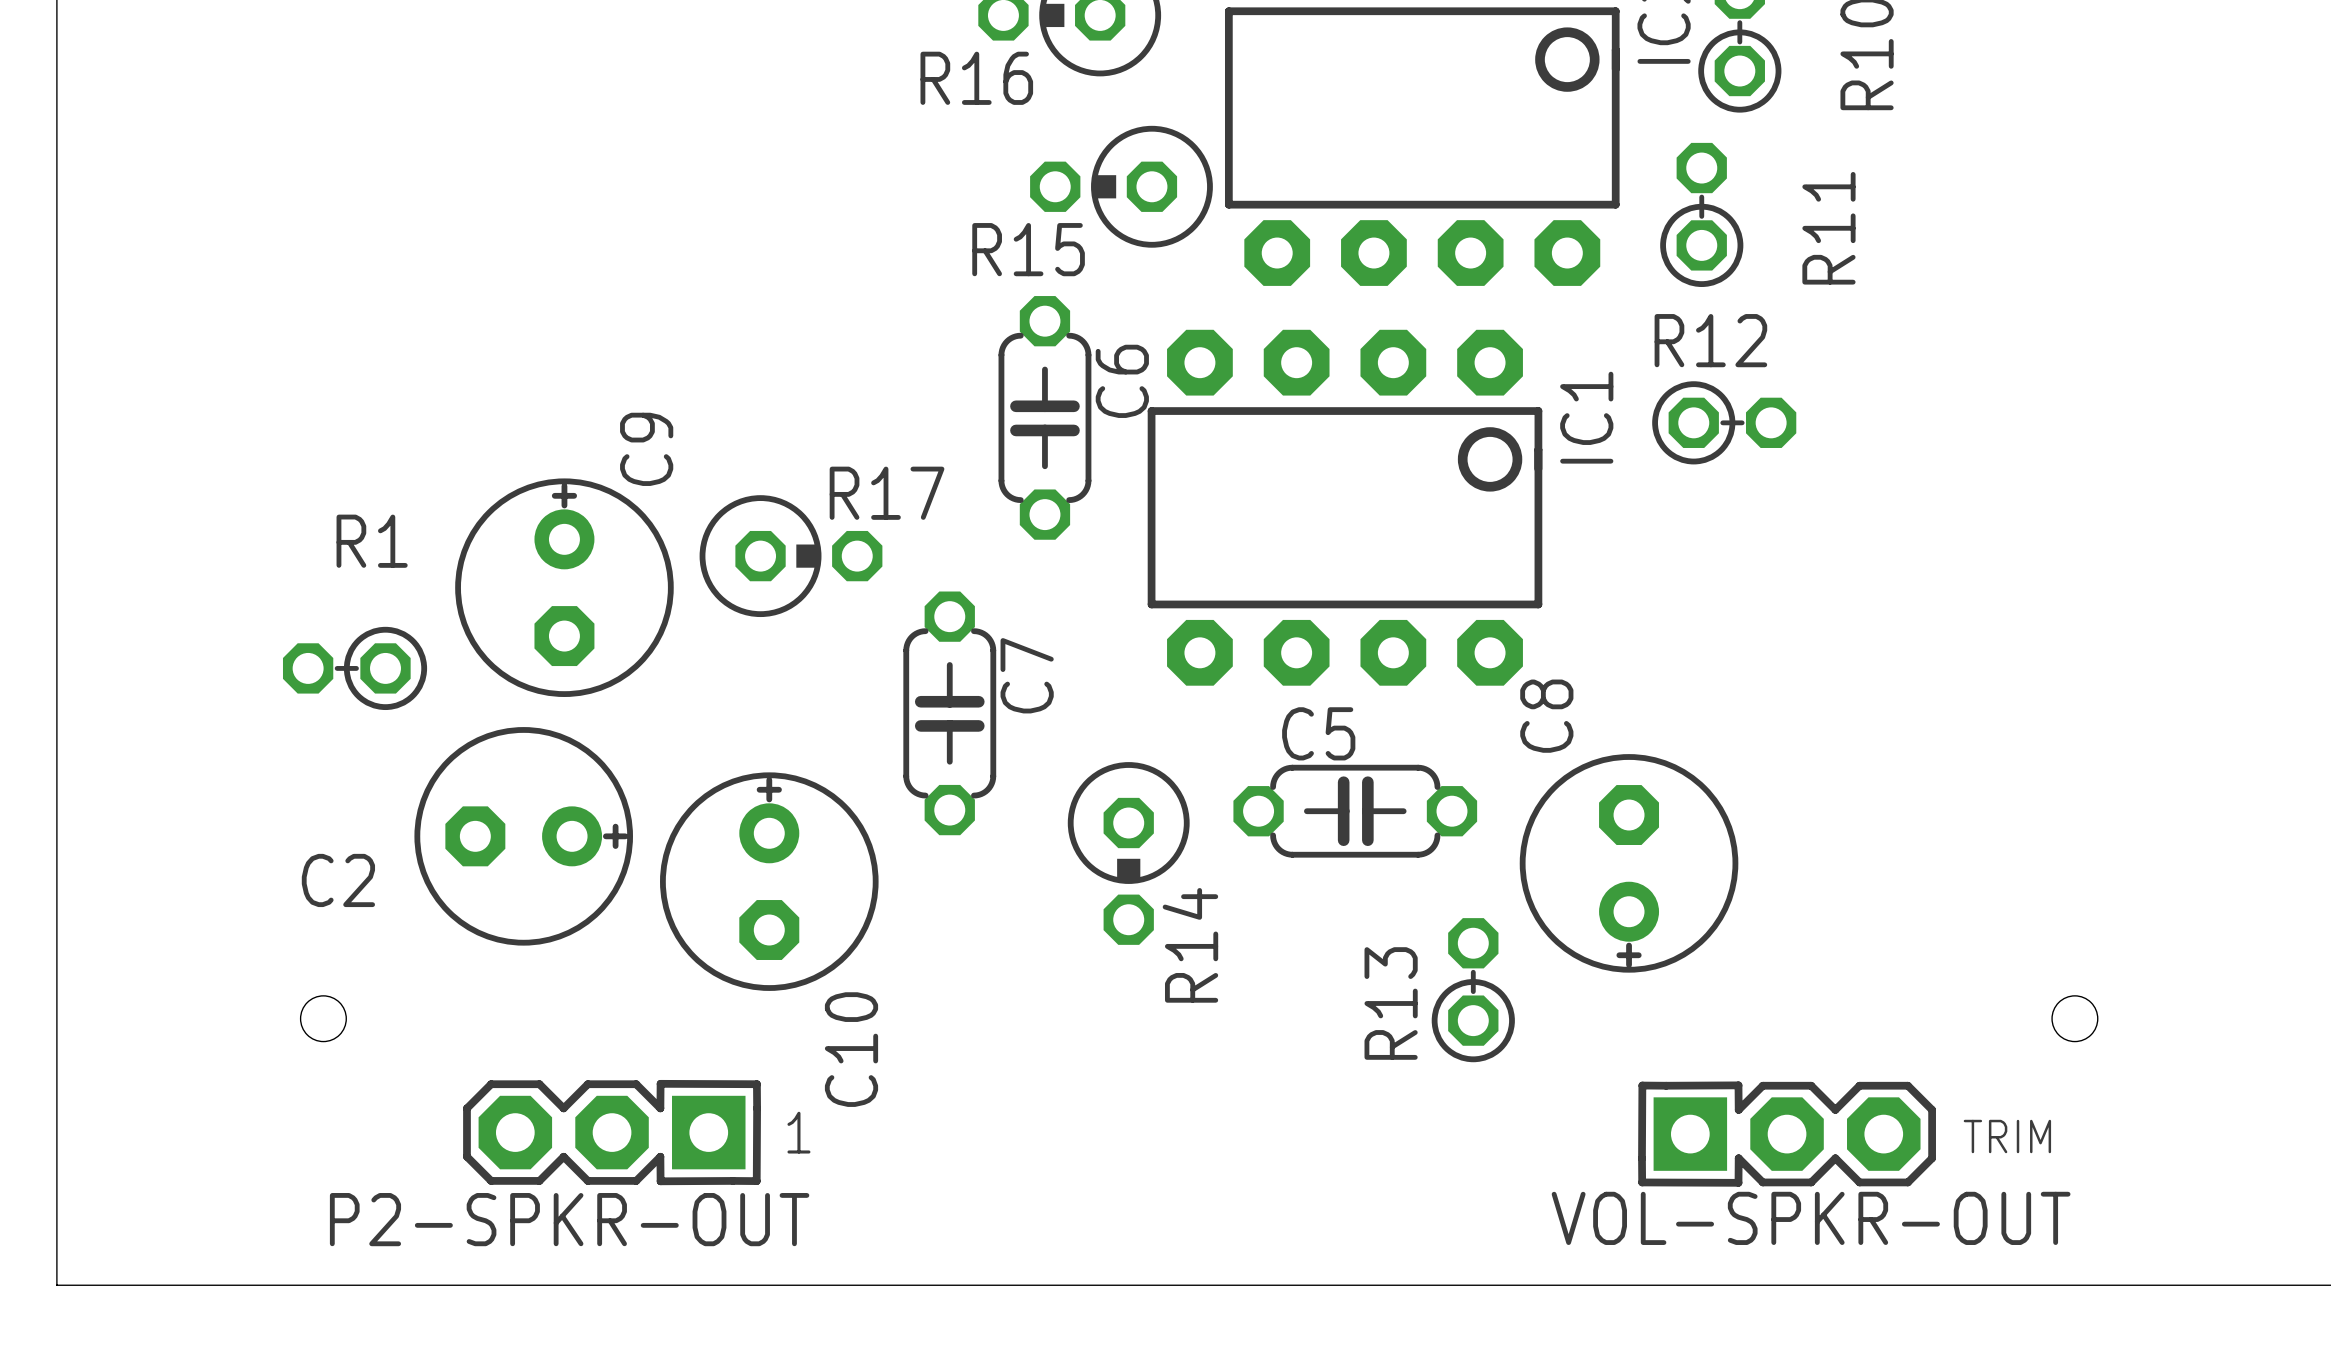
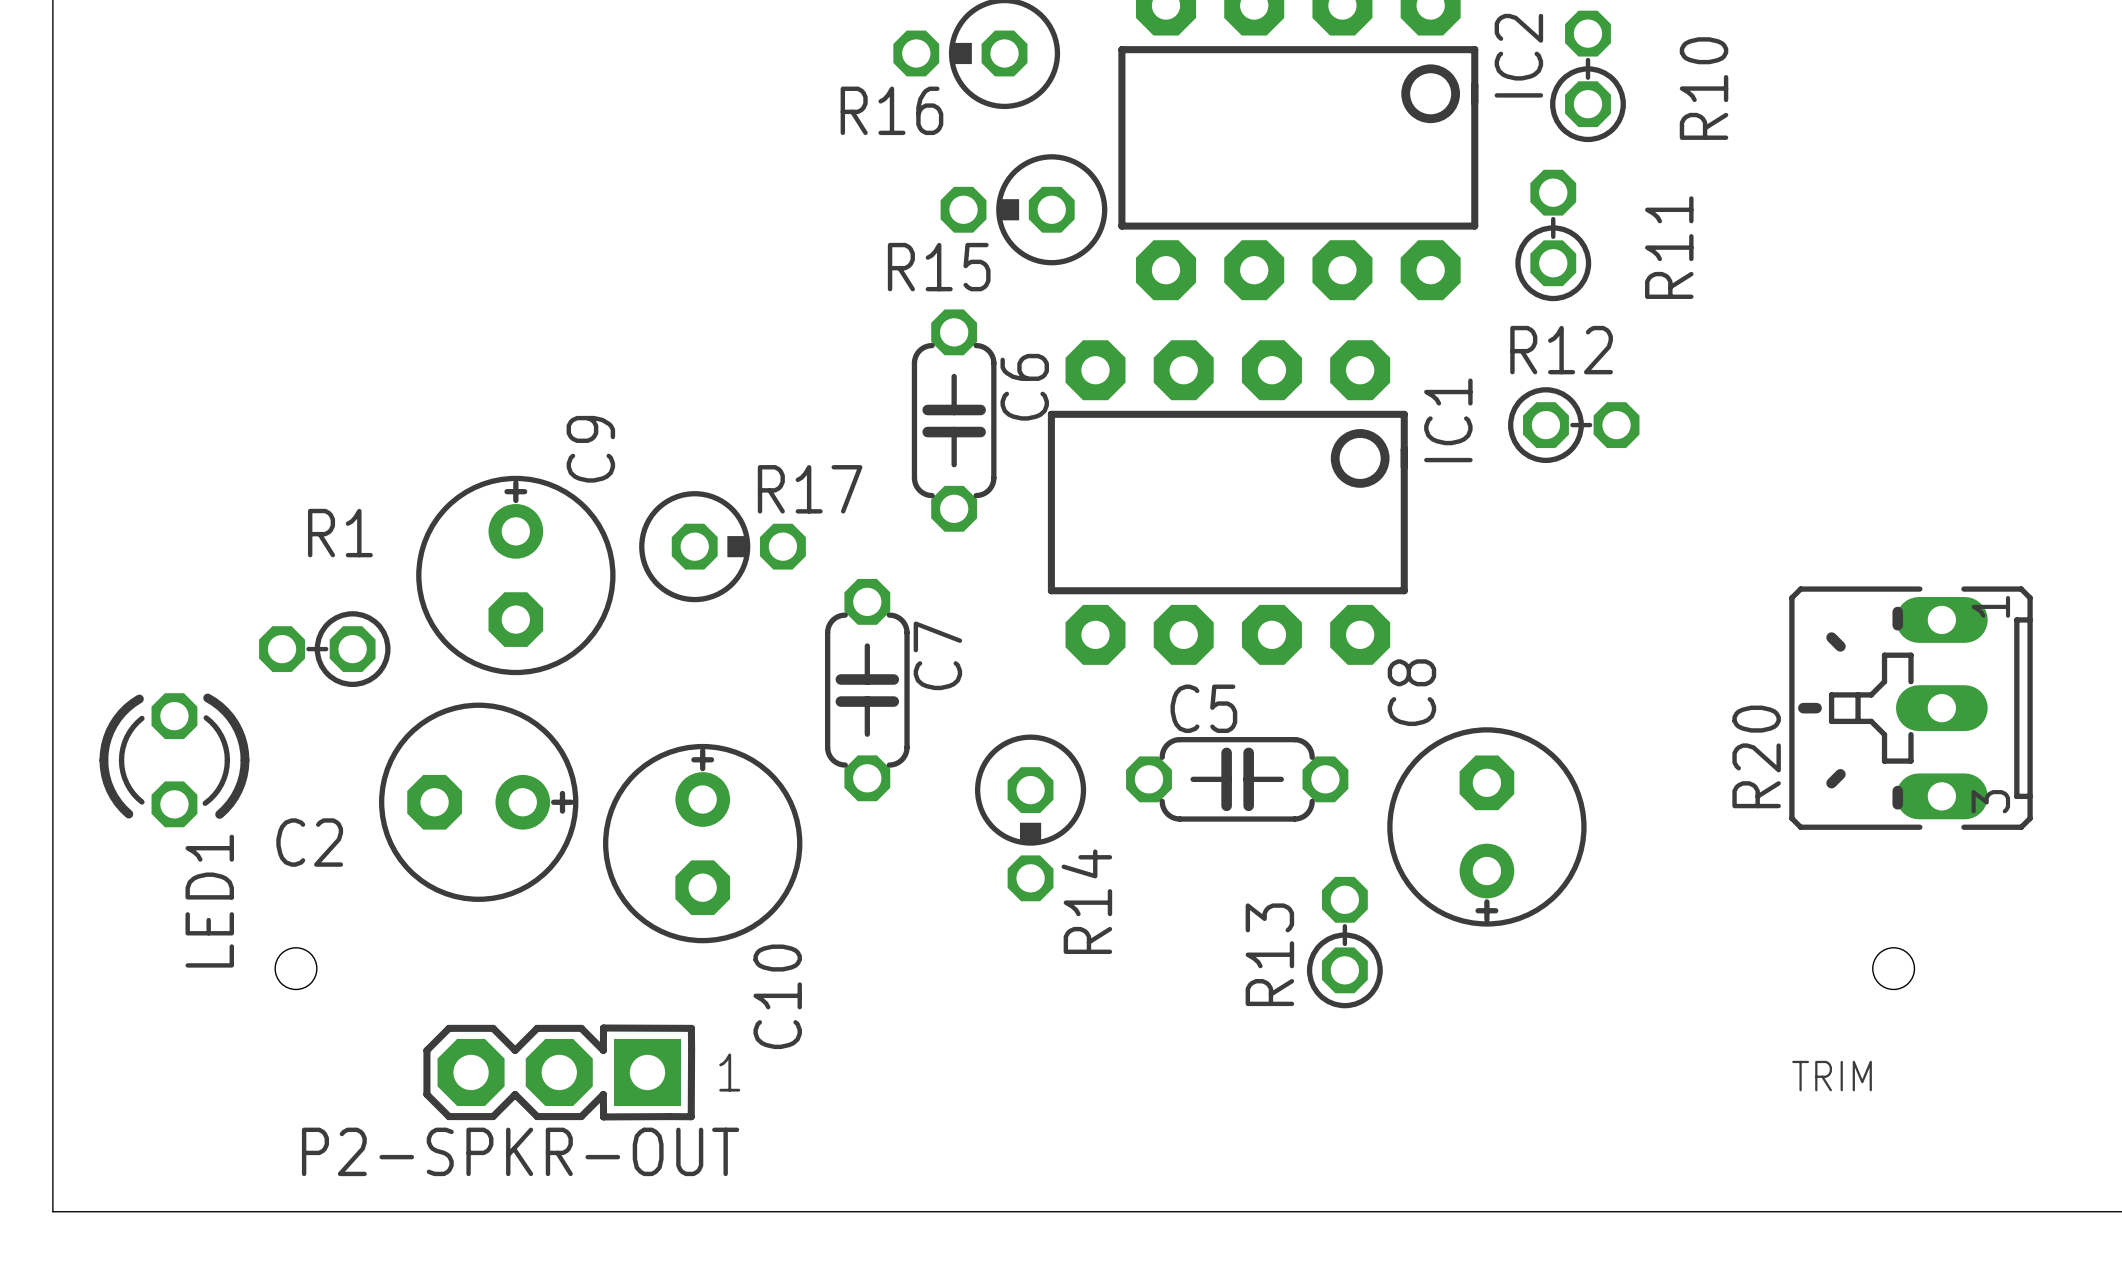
R20: none -> (1910, 708)
LED1: none -> (174, 760)
VOL-SPKR-OUT: (1787, 1134) -> none

